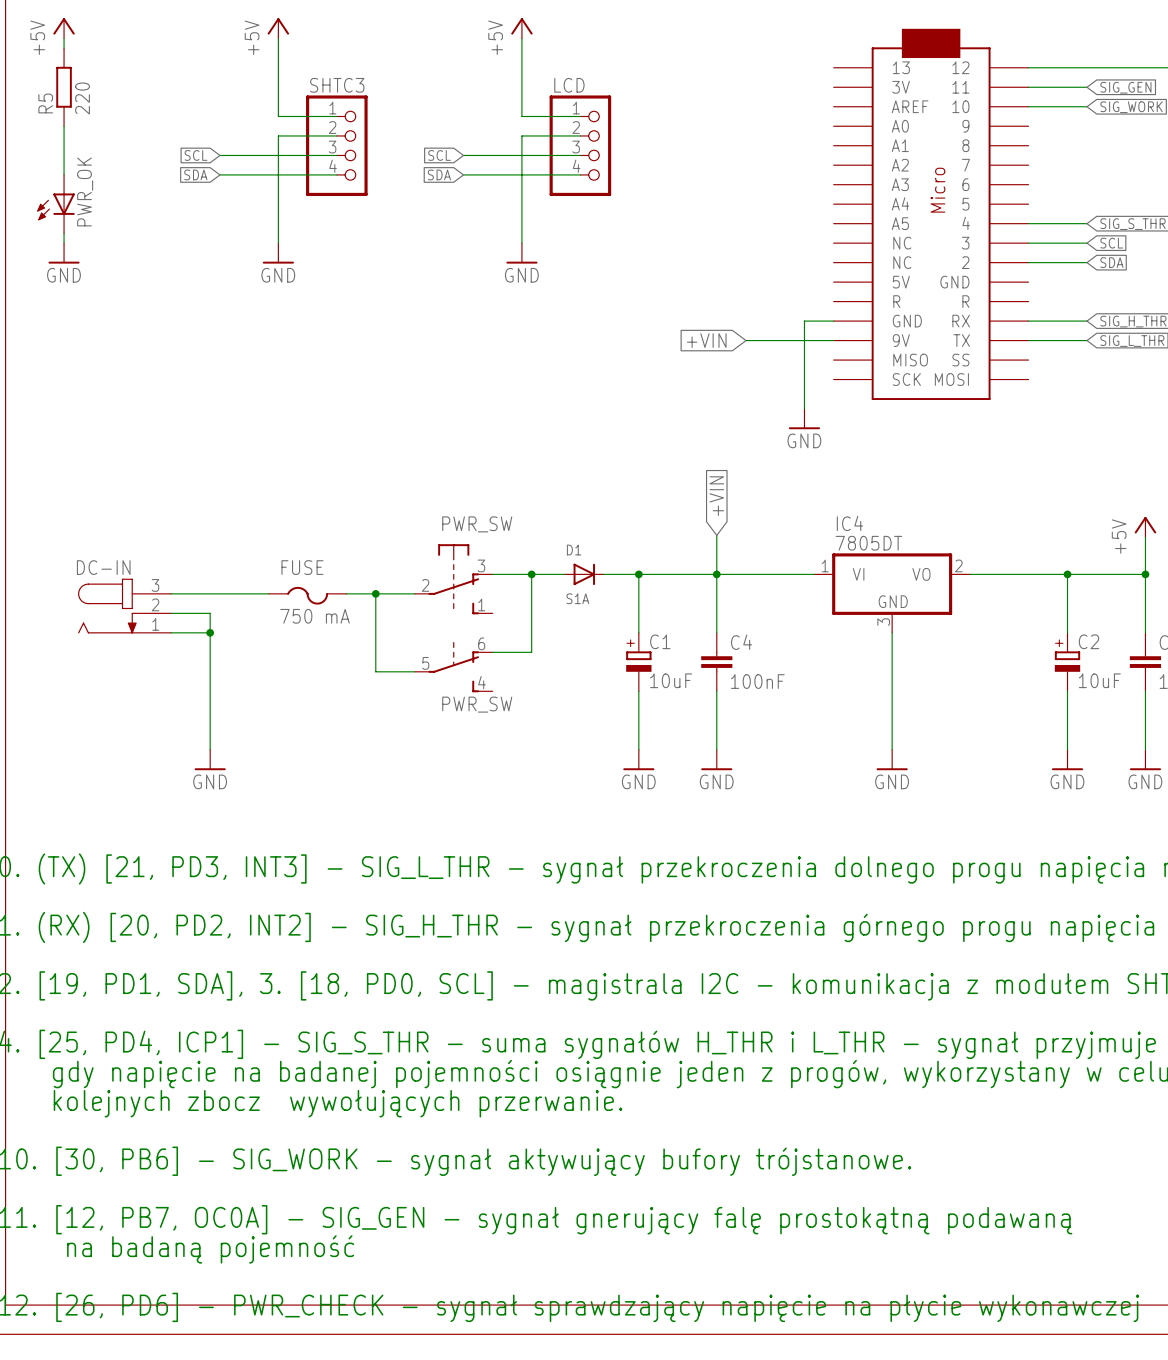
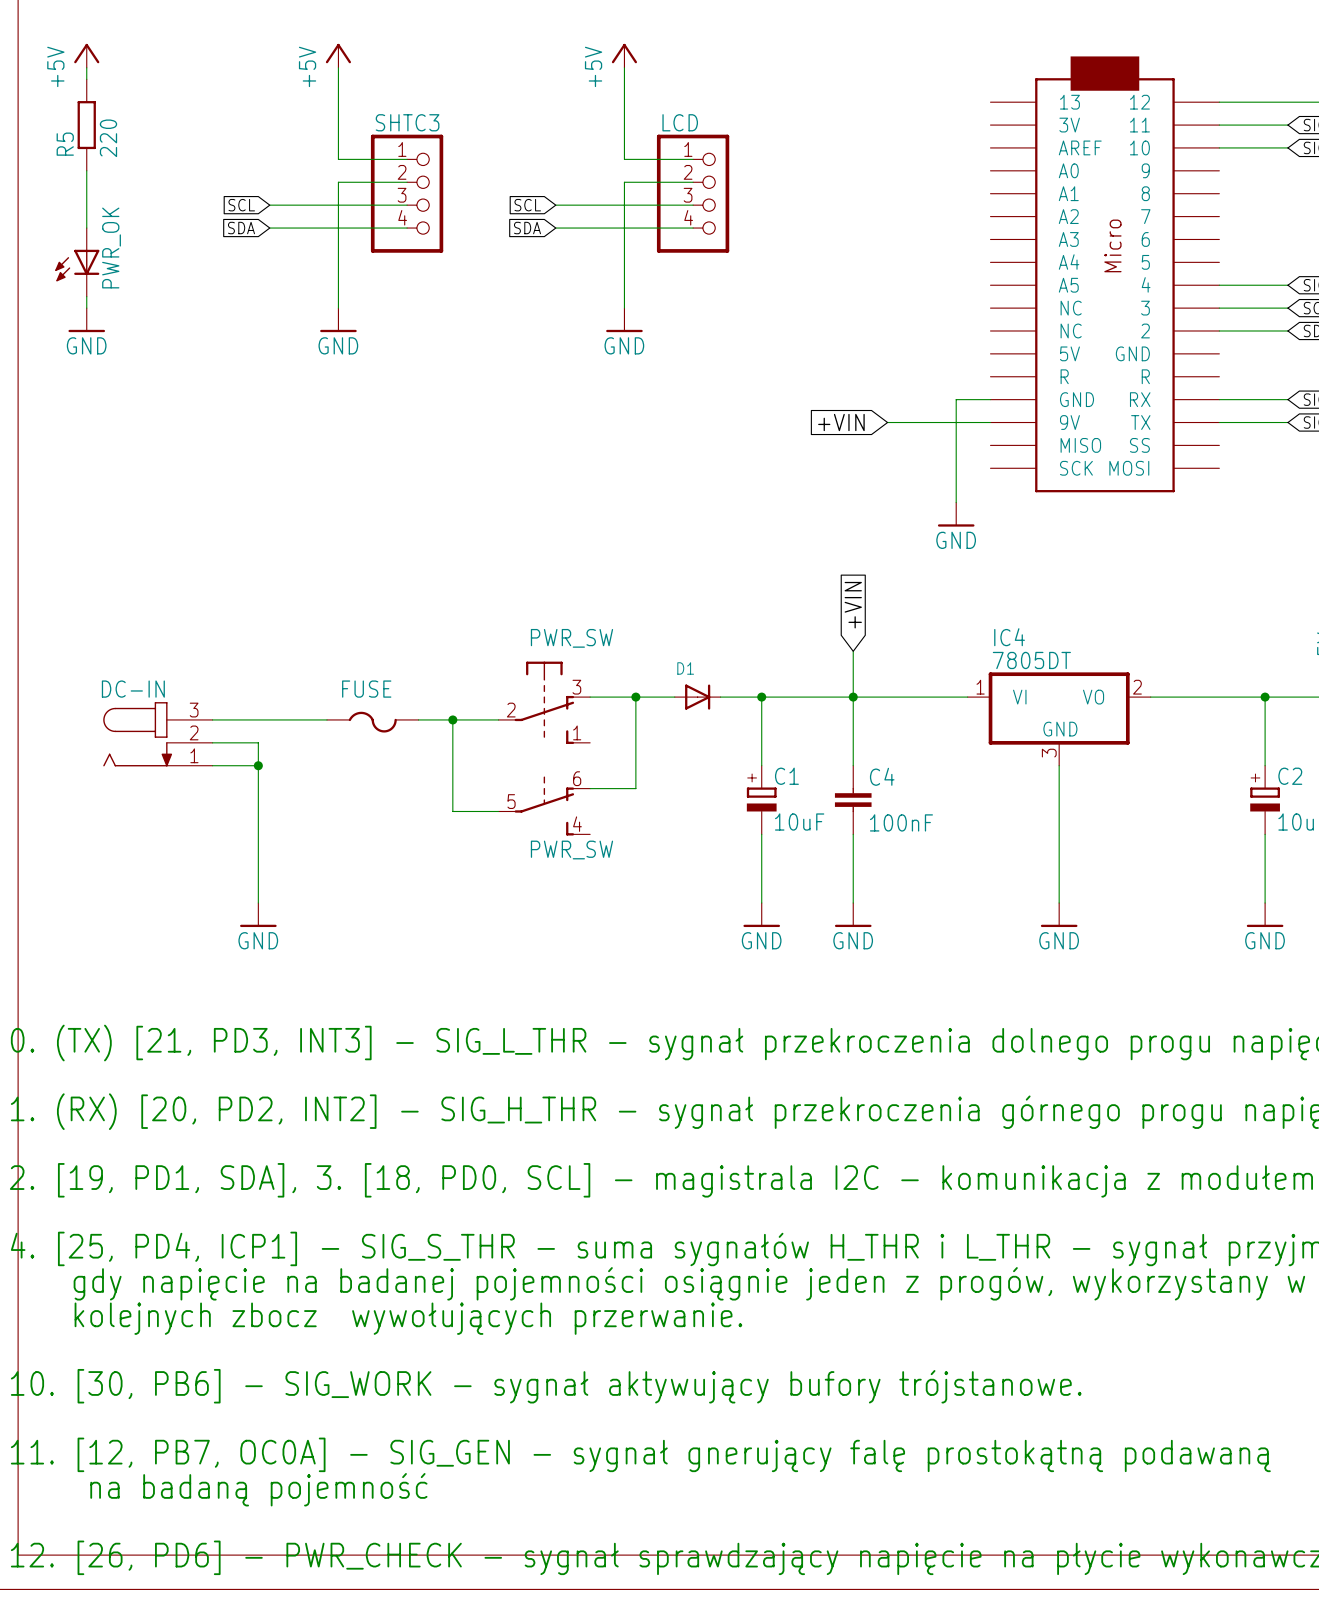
D1 value: S1A (577, 598) -> none
FUSE value: 750 mA (315, 616) -> none

